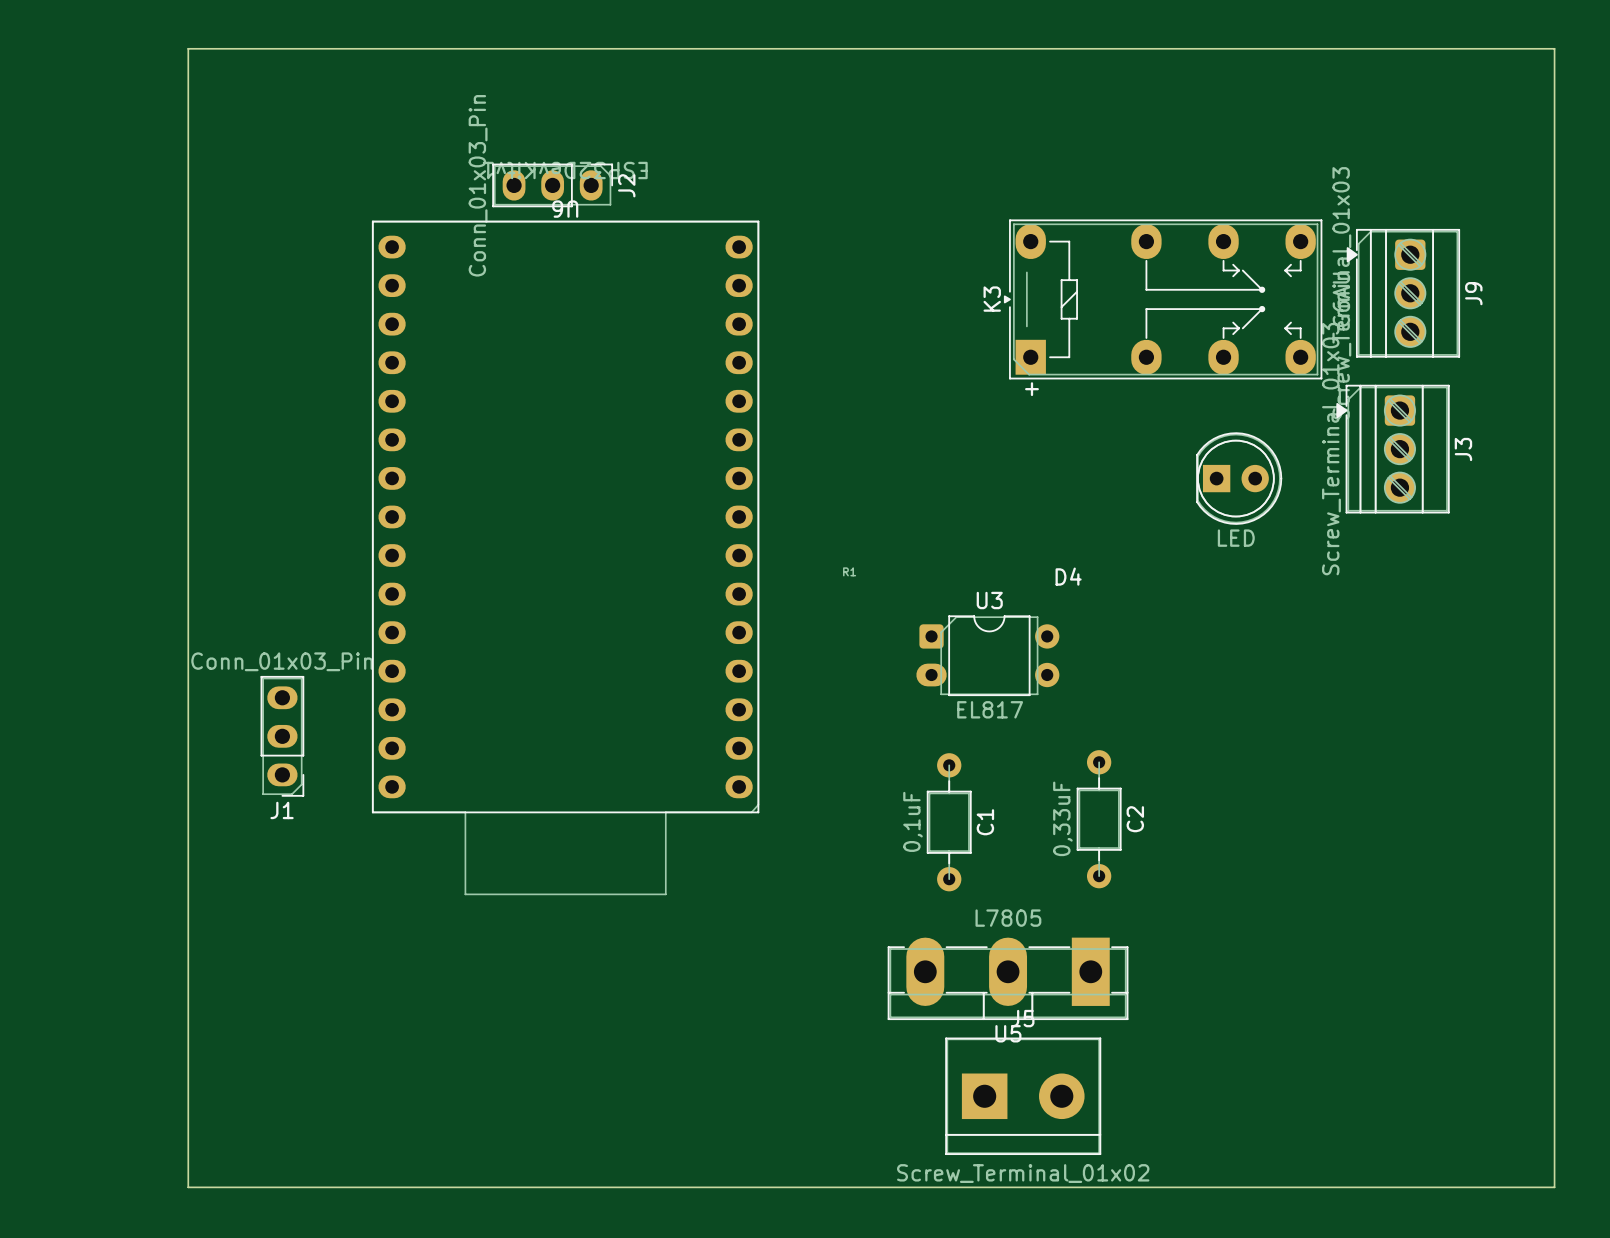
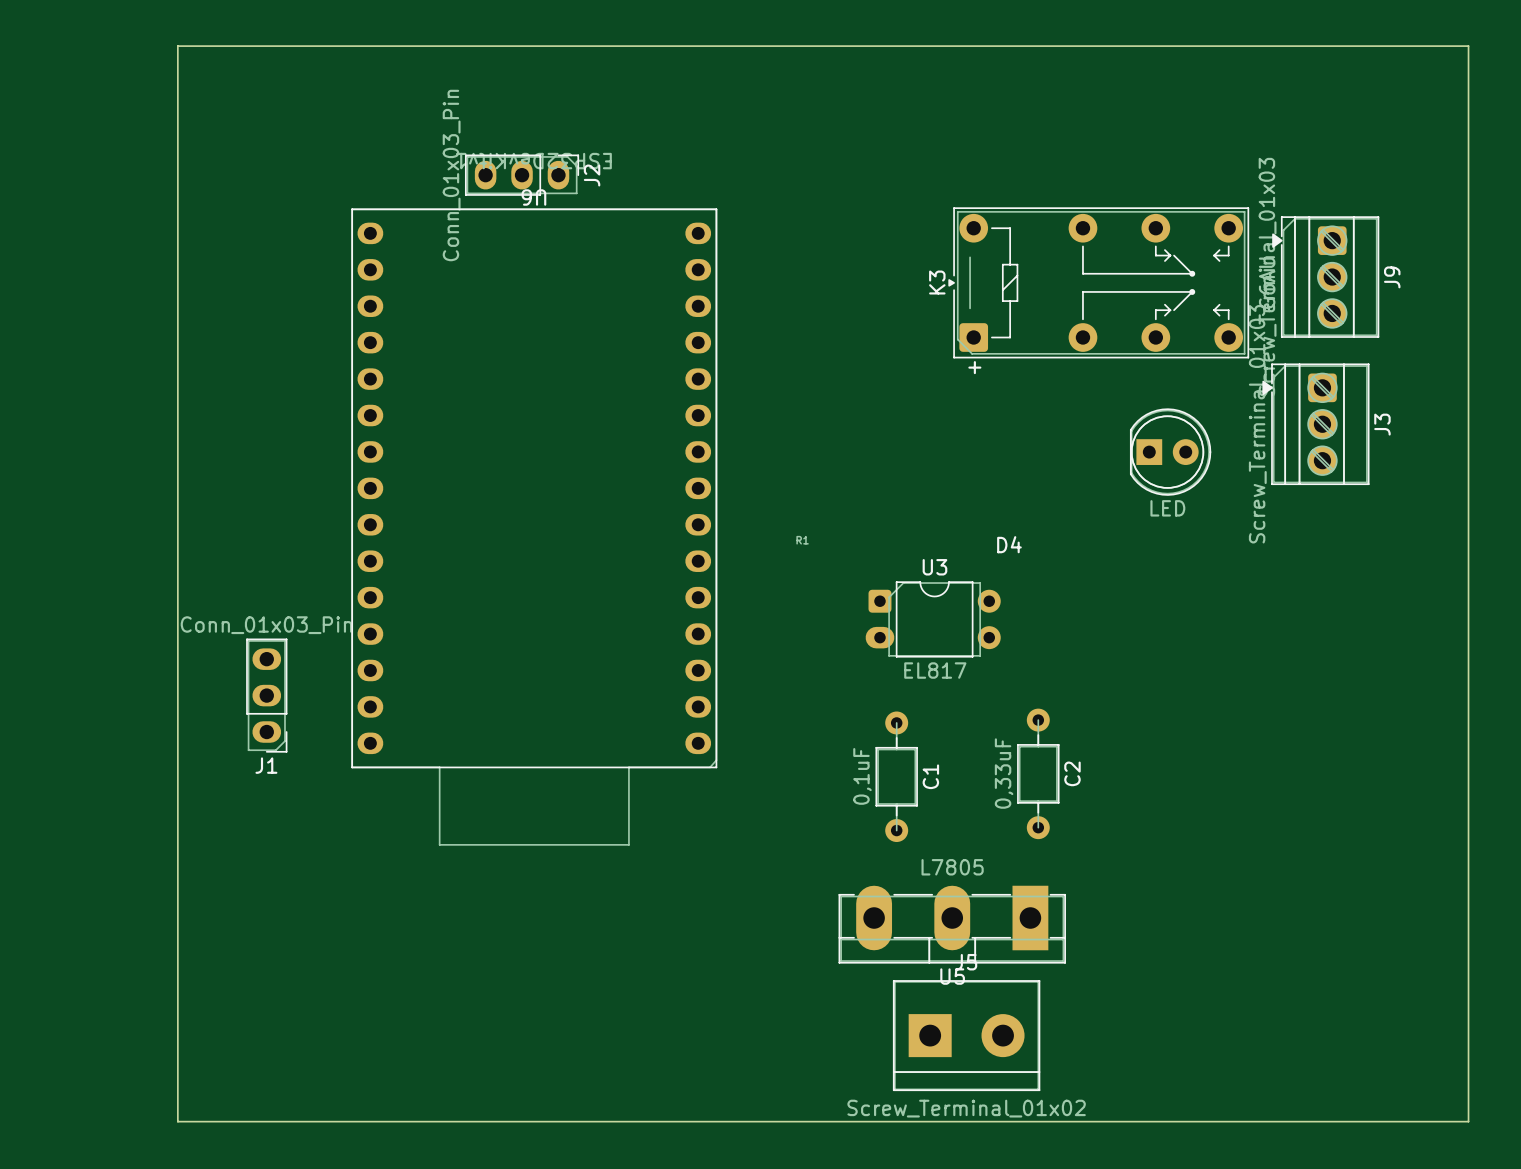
K3 footprint: [1003, 219, 1323, 380] -> [948, 207, 1250, 359]

